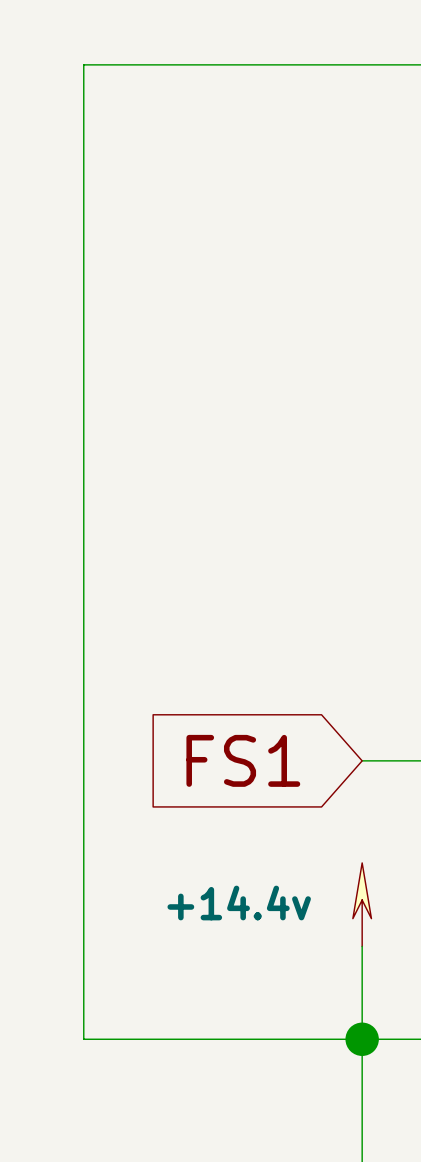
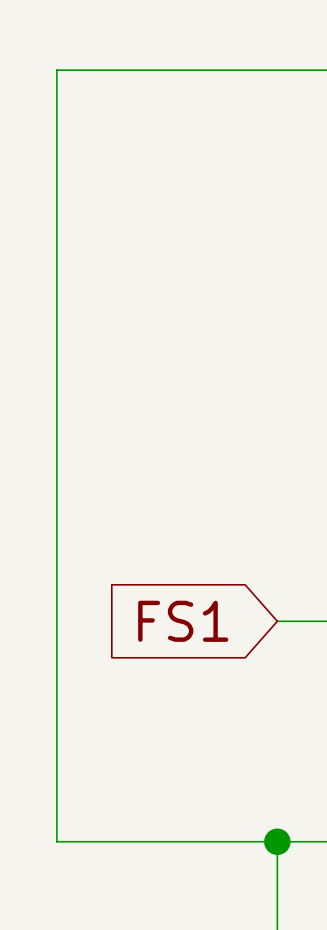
power symbol: +14.4v (362, 904) -> none
wire: (362, 946) (362, 1039) -> none

